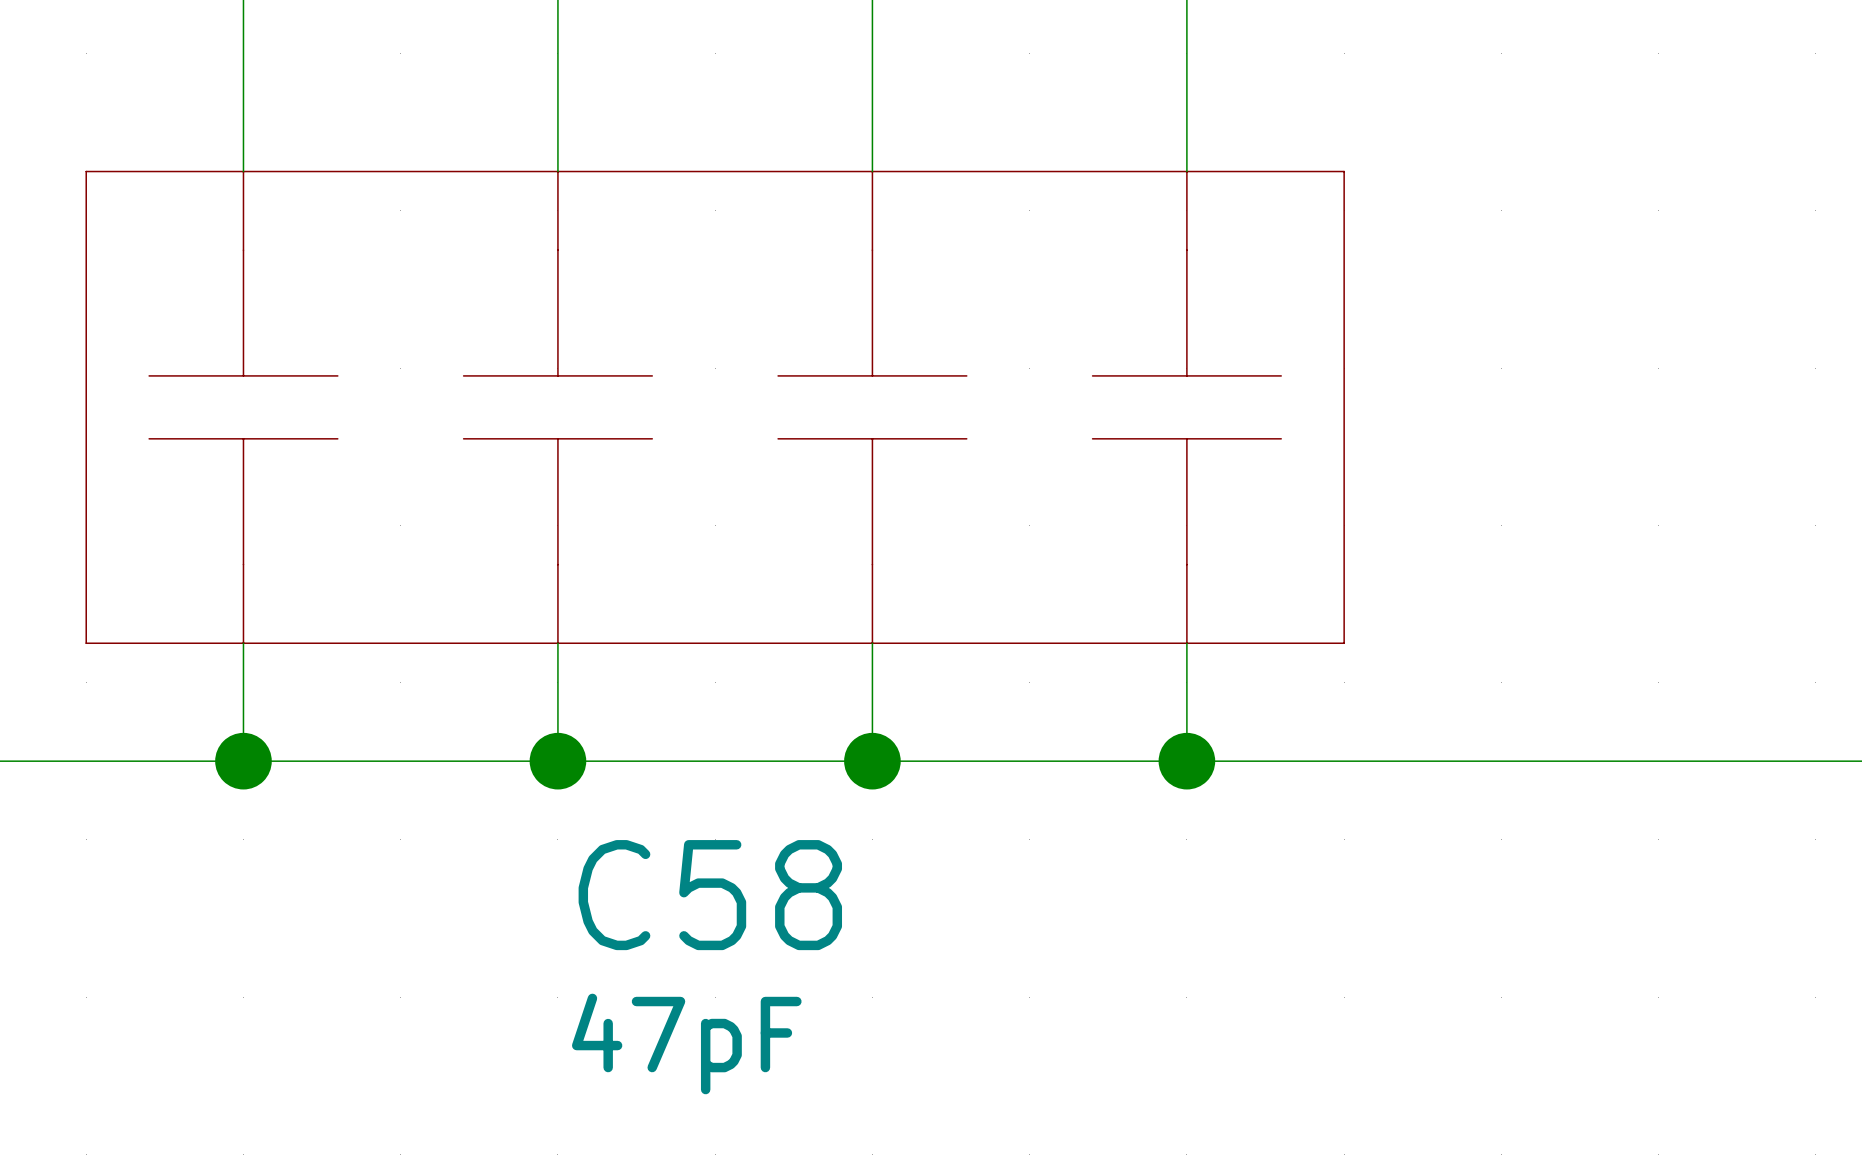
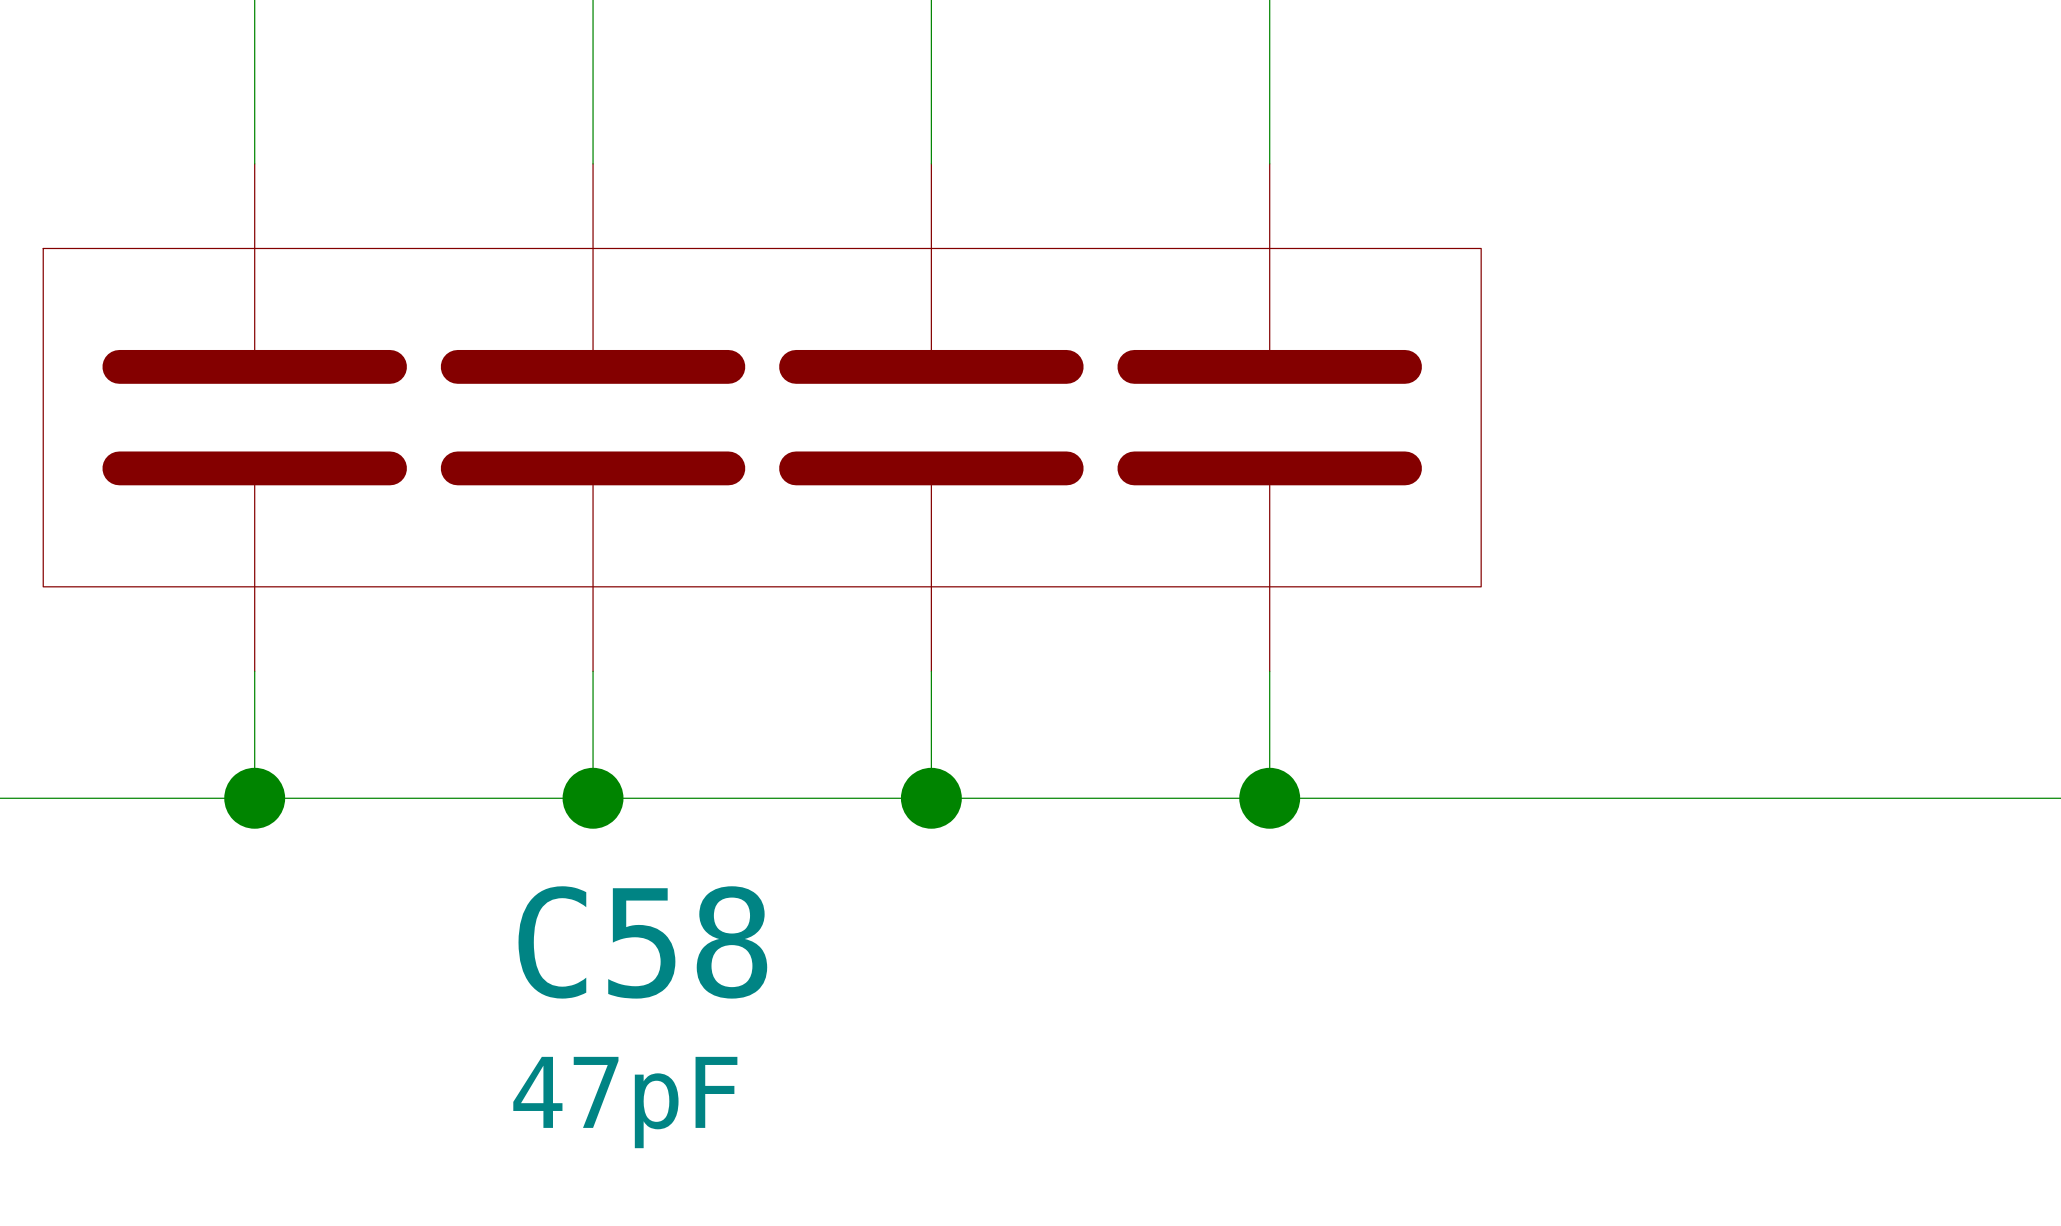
C58 symbol: [86, 171, 1345, 644] -> [43, 163, 1482, 672]

